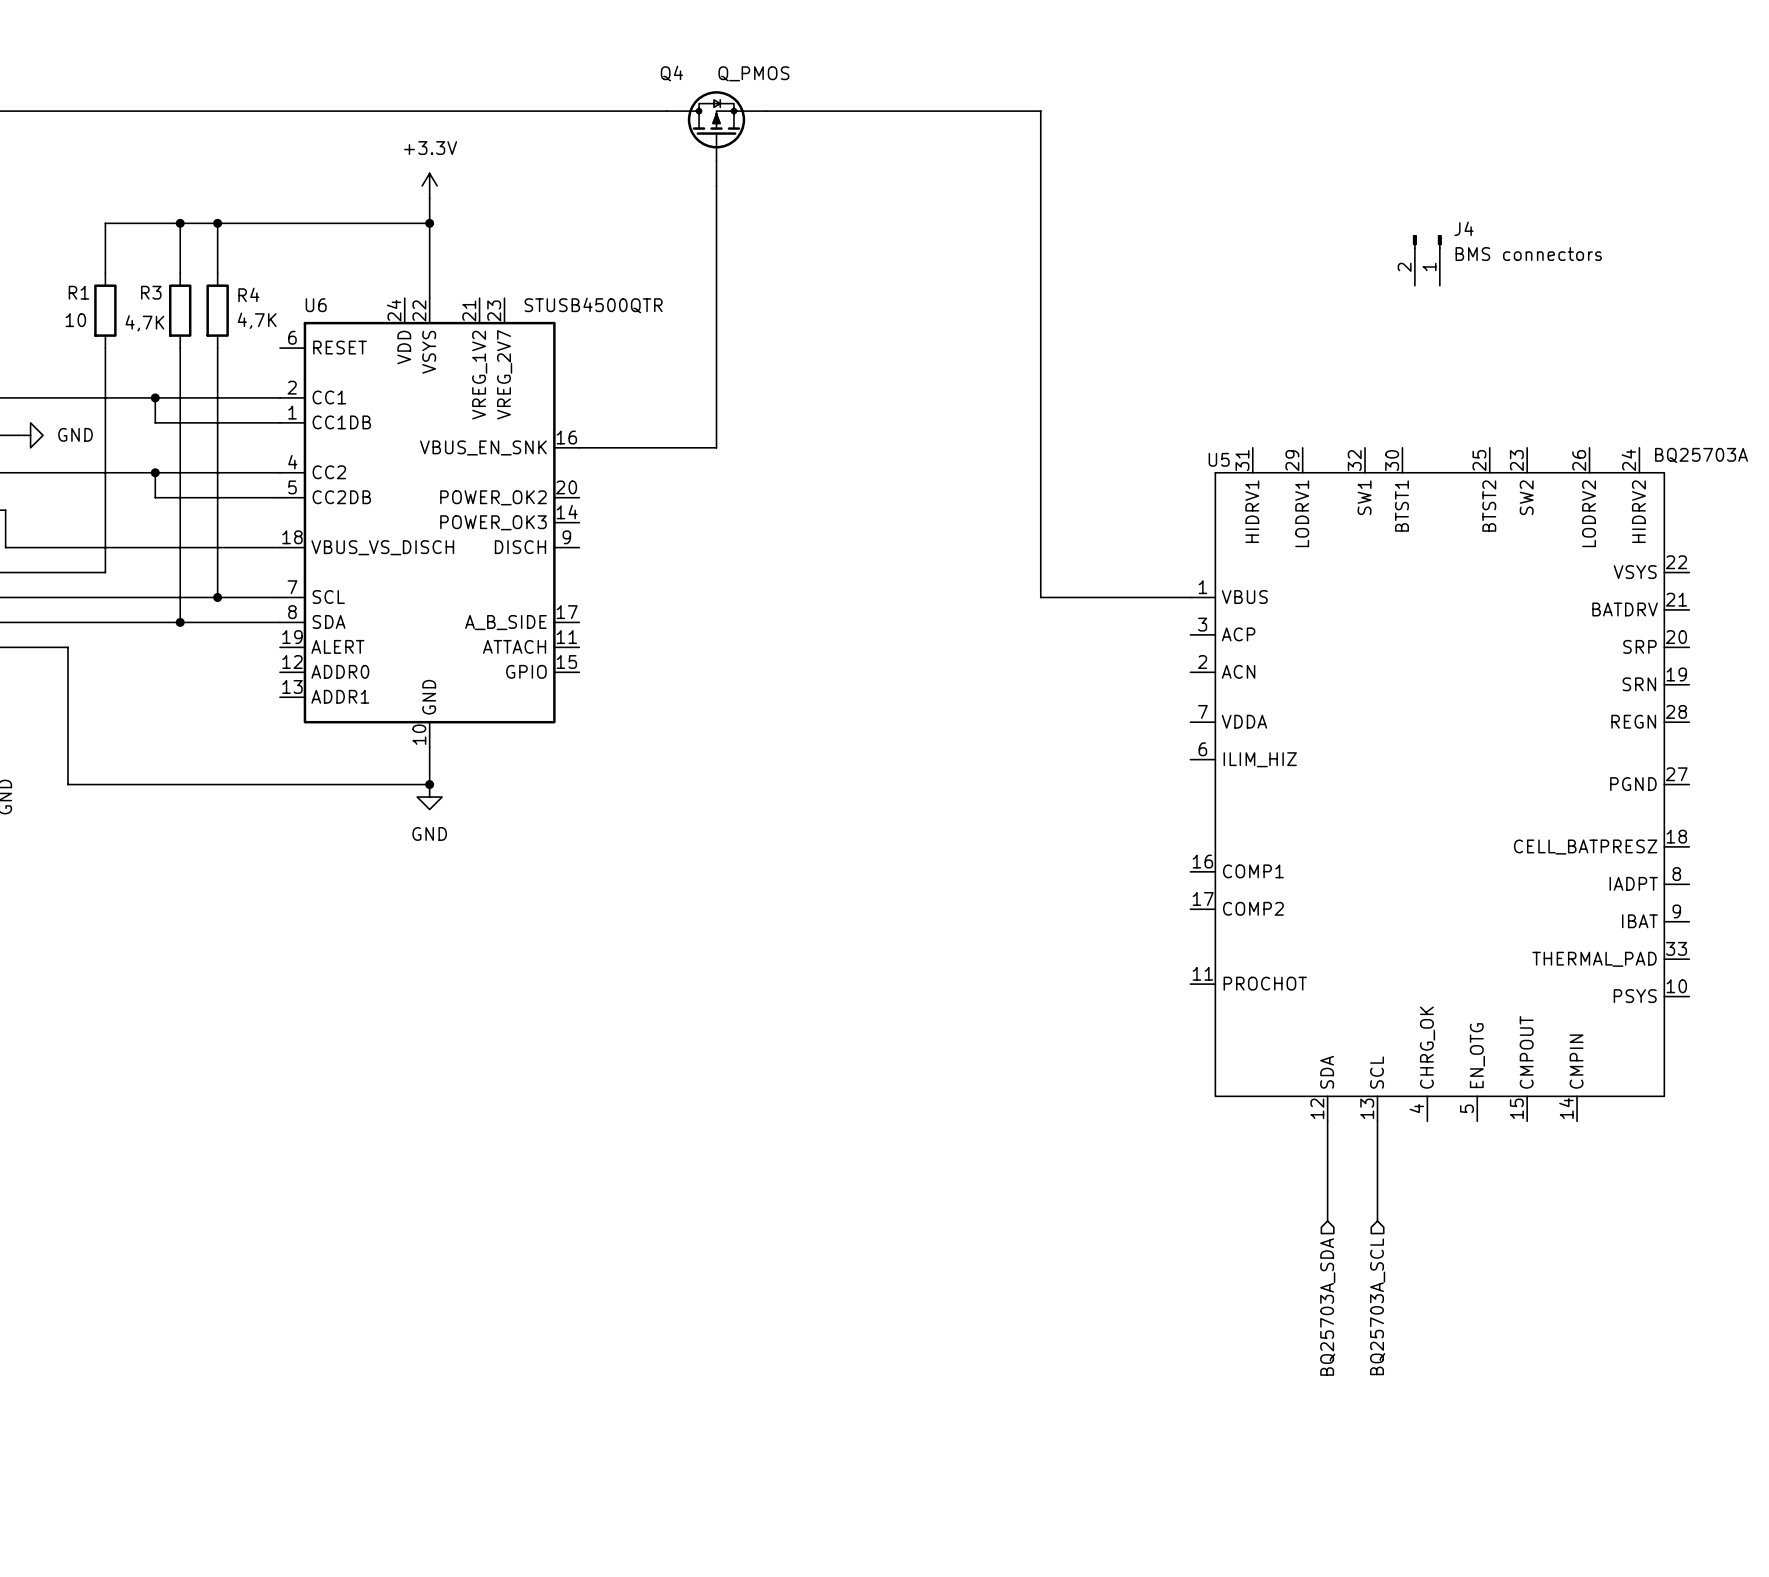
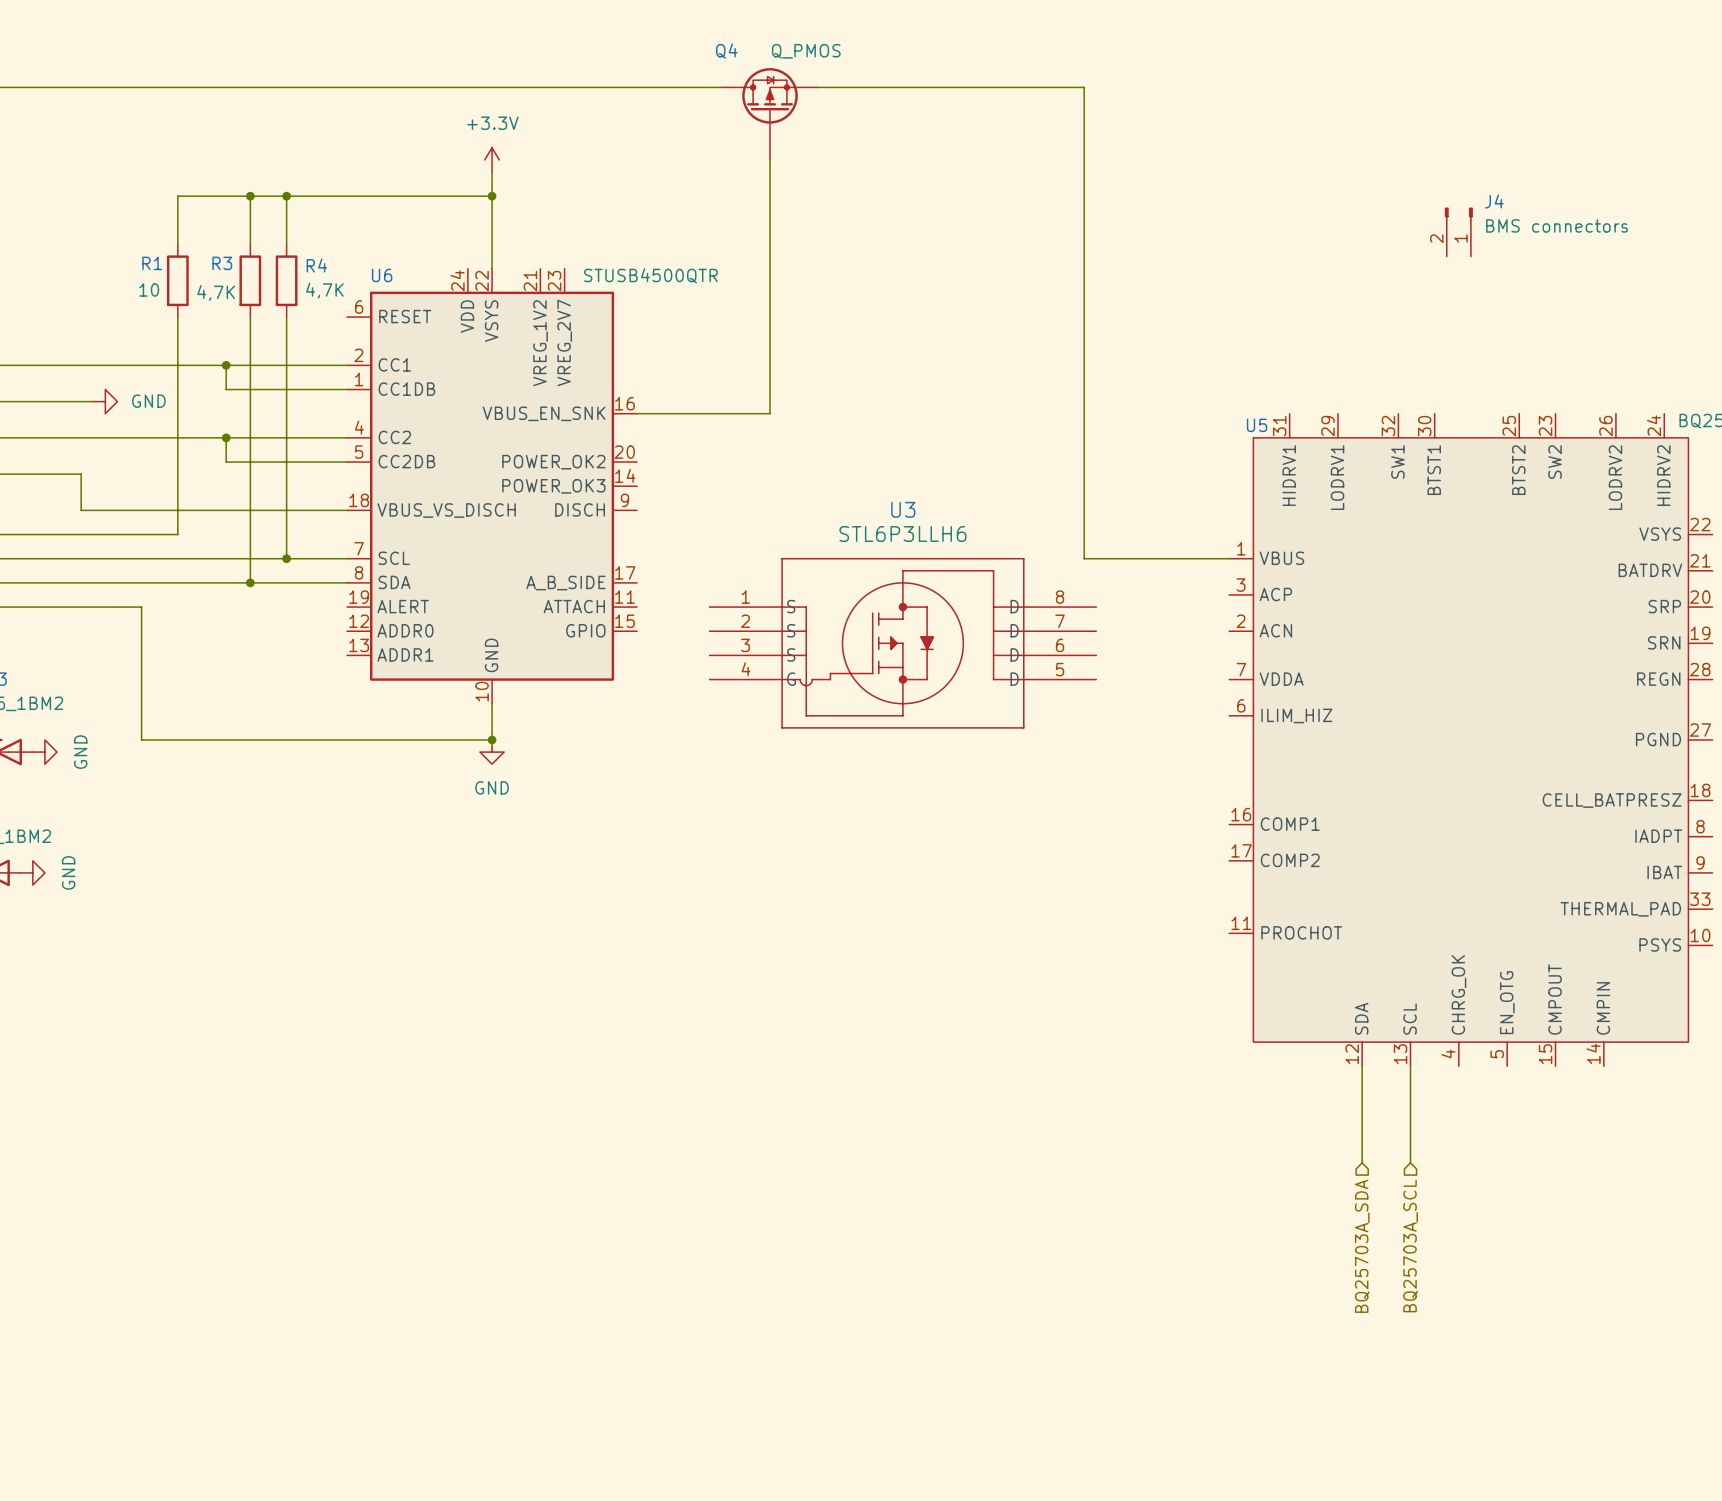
U3: none -> STL6P3LLH6 (902, 643)

